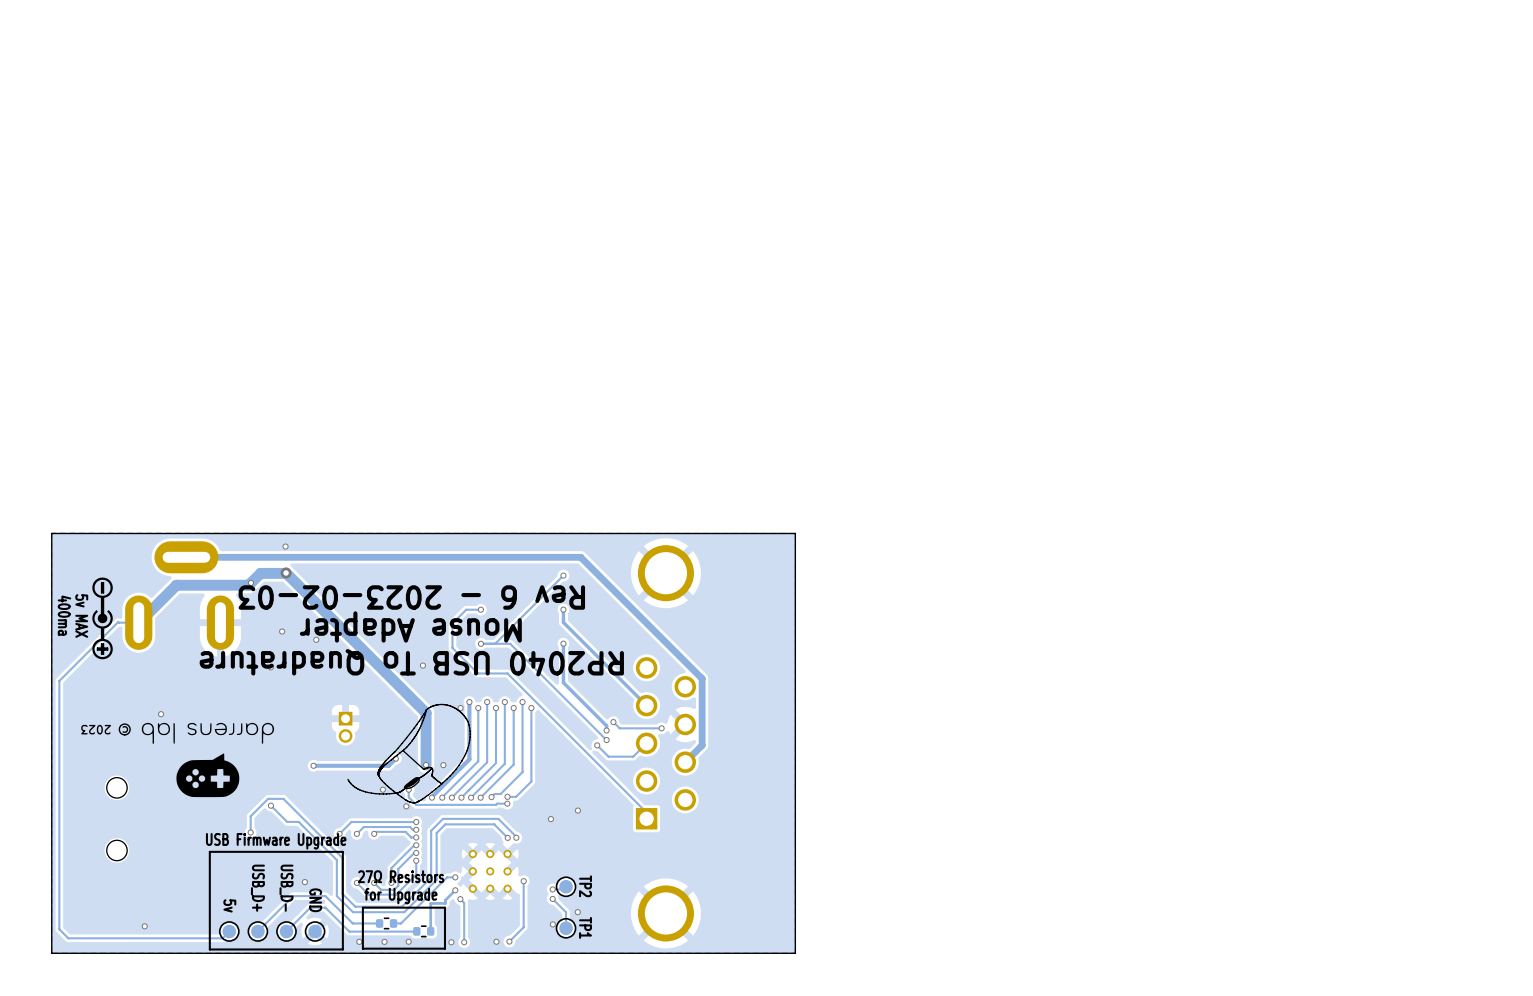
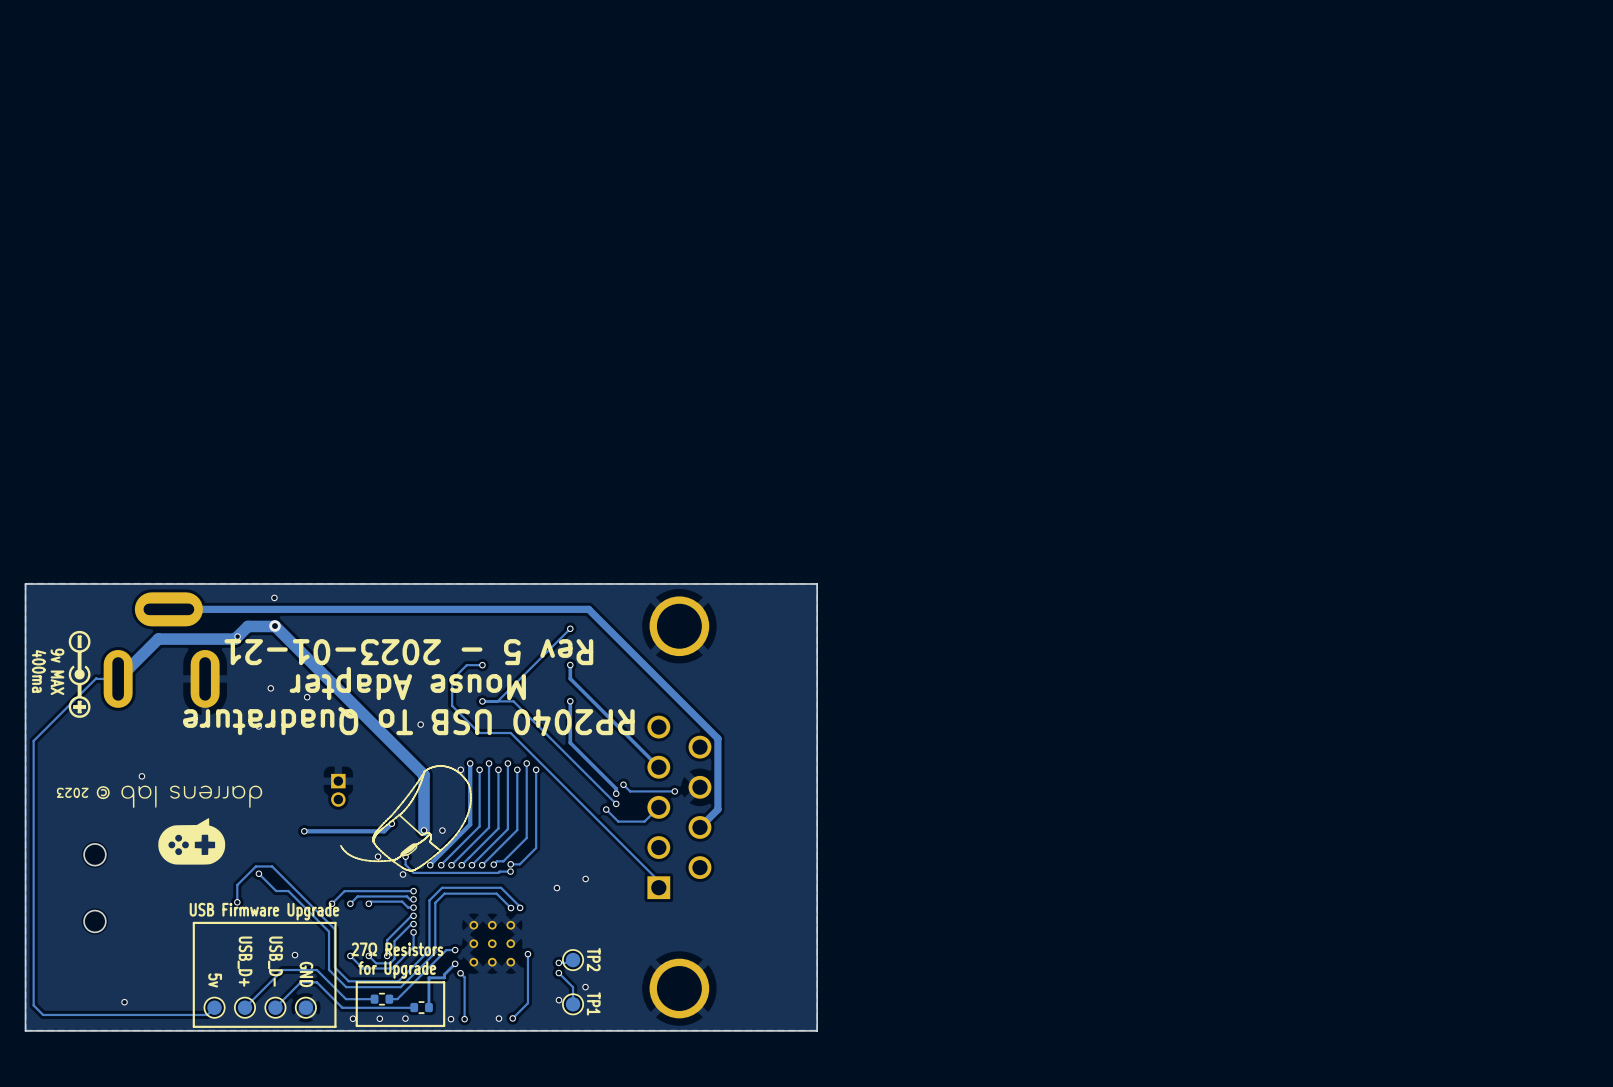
text: Rev 6 - 2023-02-03 (411, 597) -> Rev 5 - 2023-01-21 (408, 652)
text: 5v MAX (81, 615) -> 9v MAX (57, 671)

